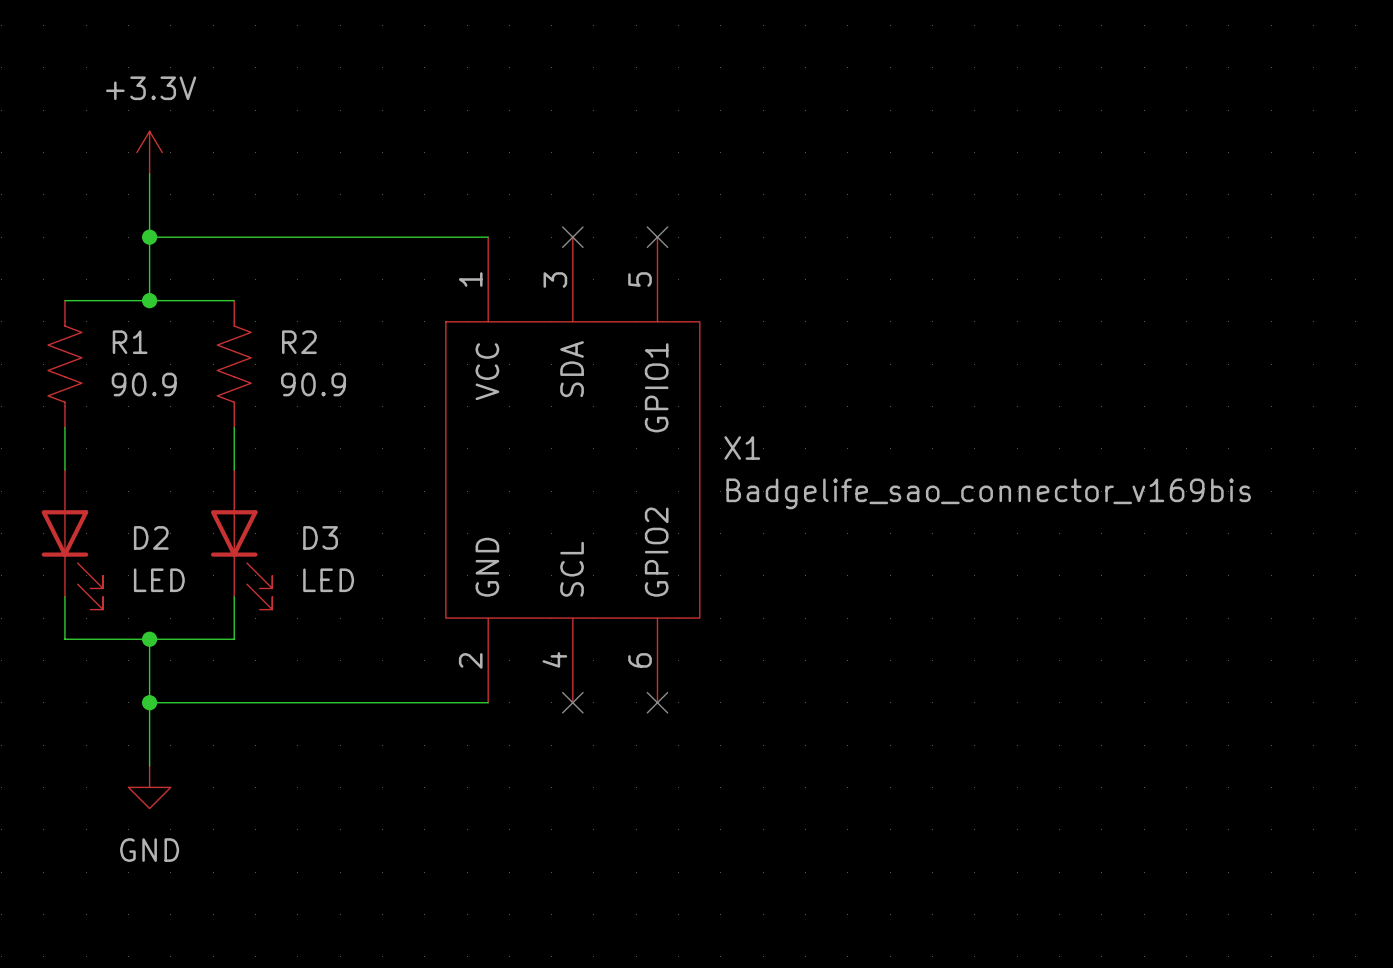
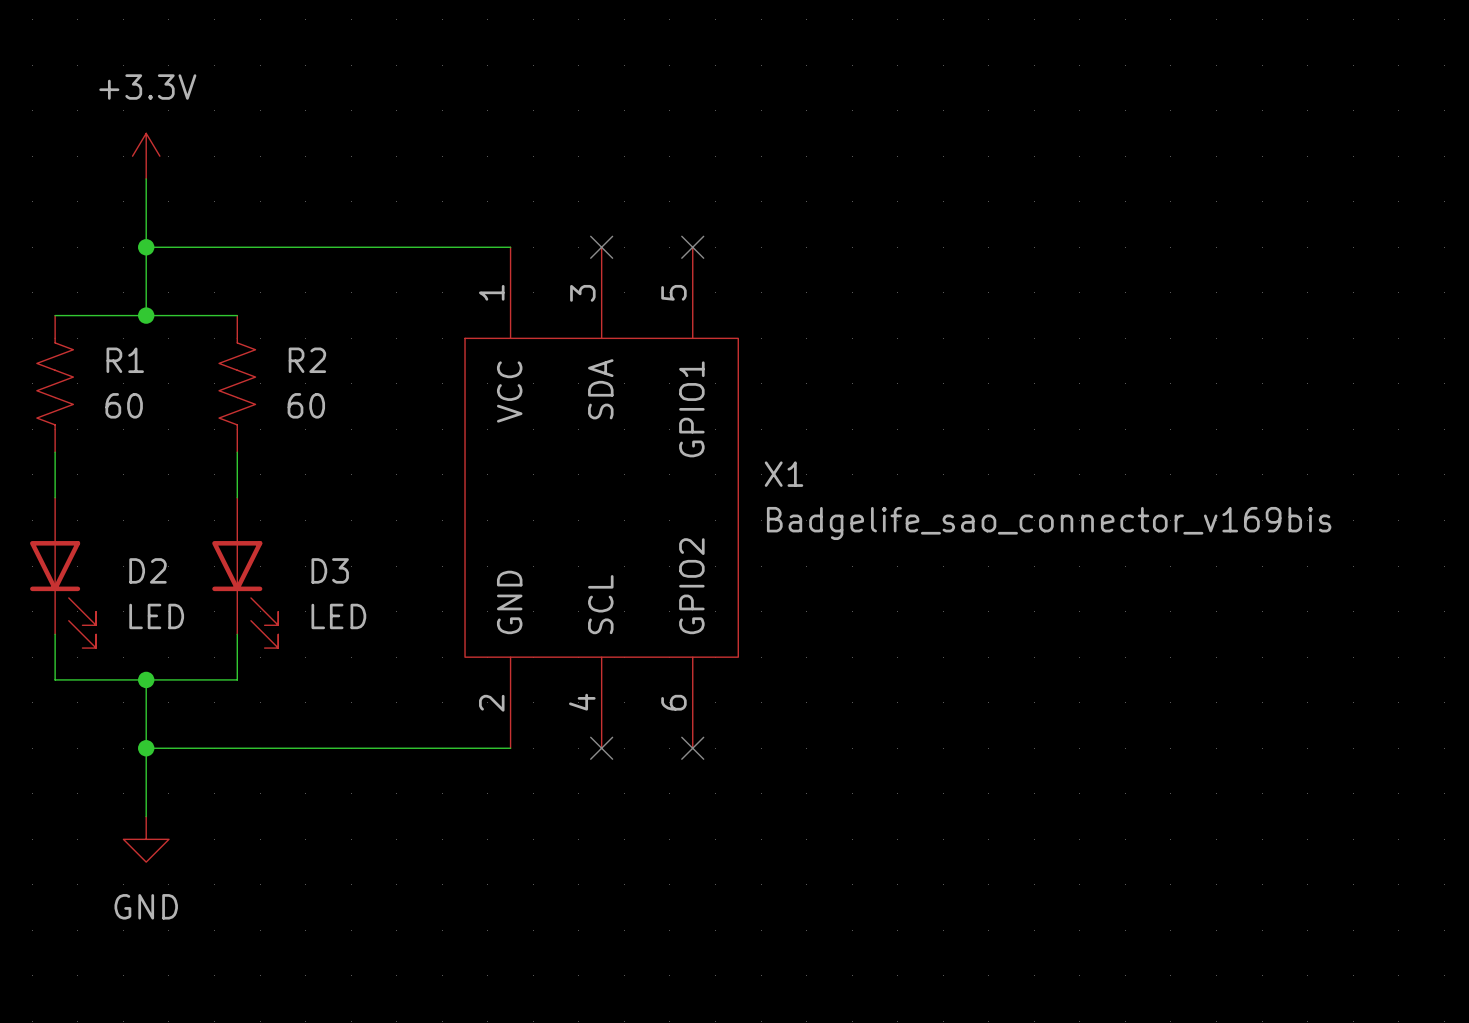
R1 value: 90.9 (144, 384) -> 60 (124, 405)
R2 value: 90.9 (313, 384) -> 60 (306, 405)

